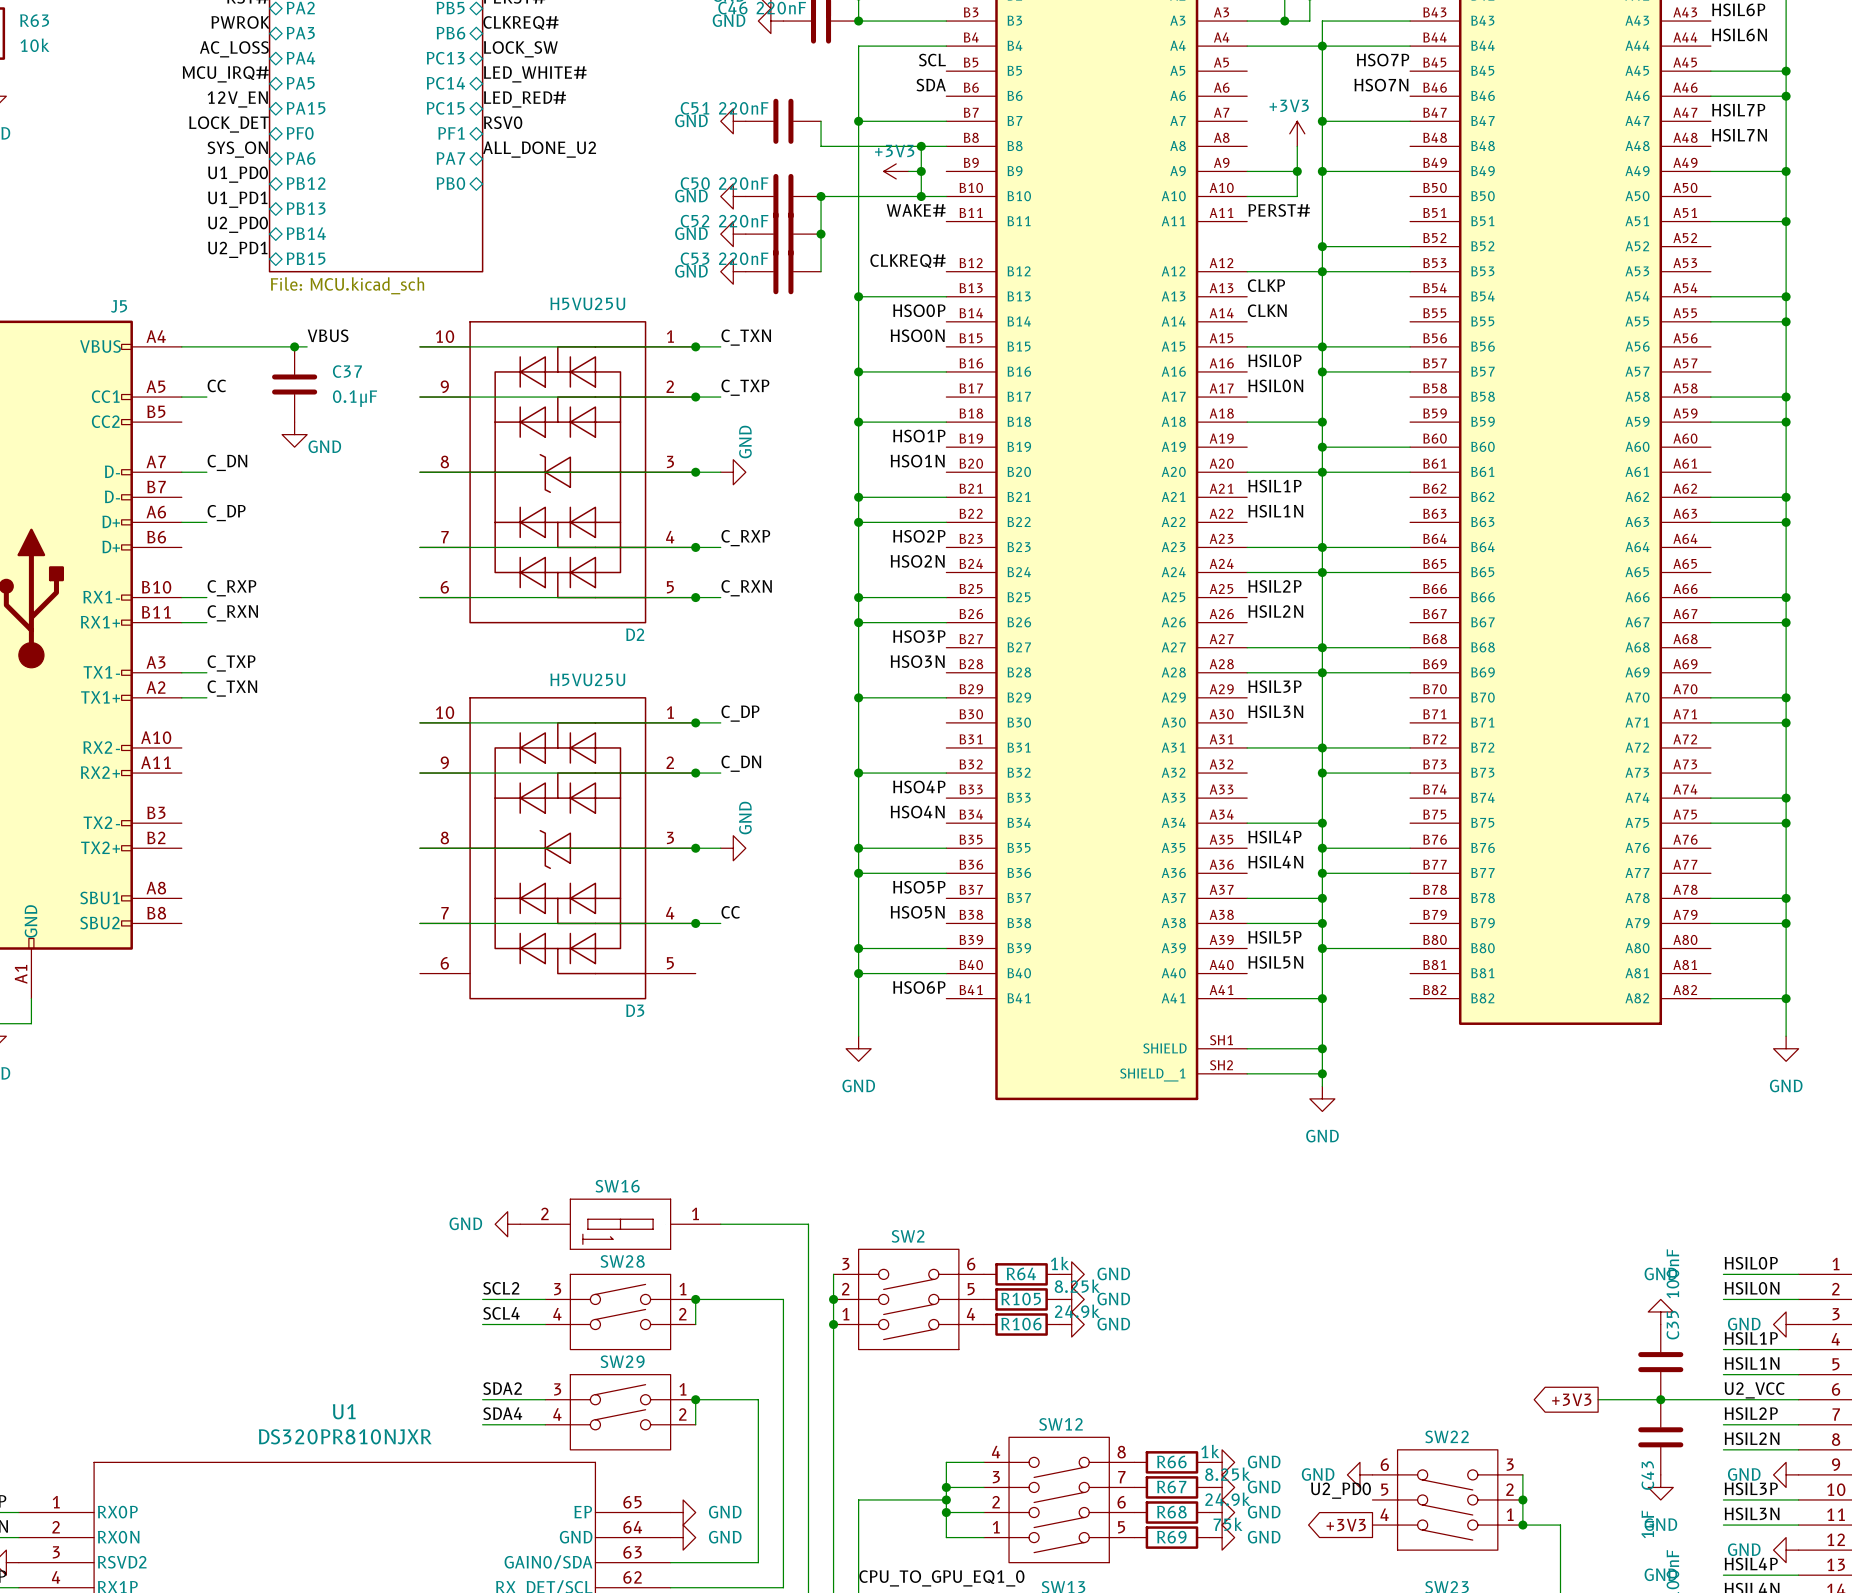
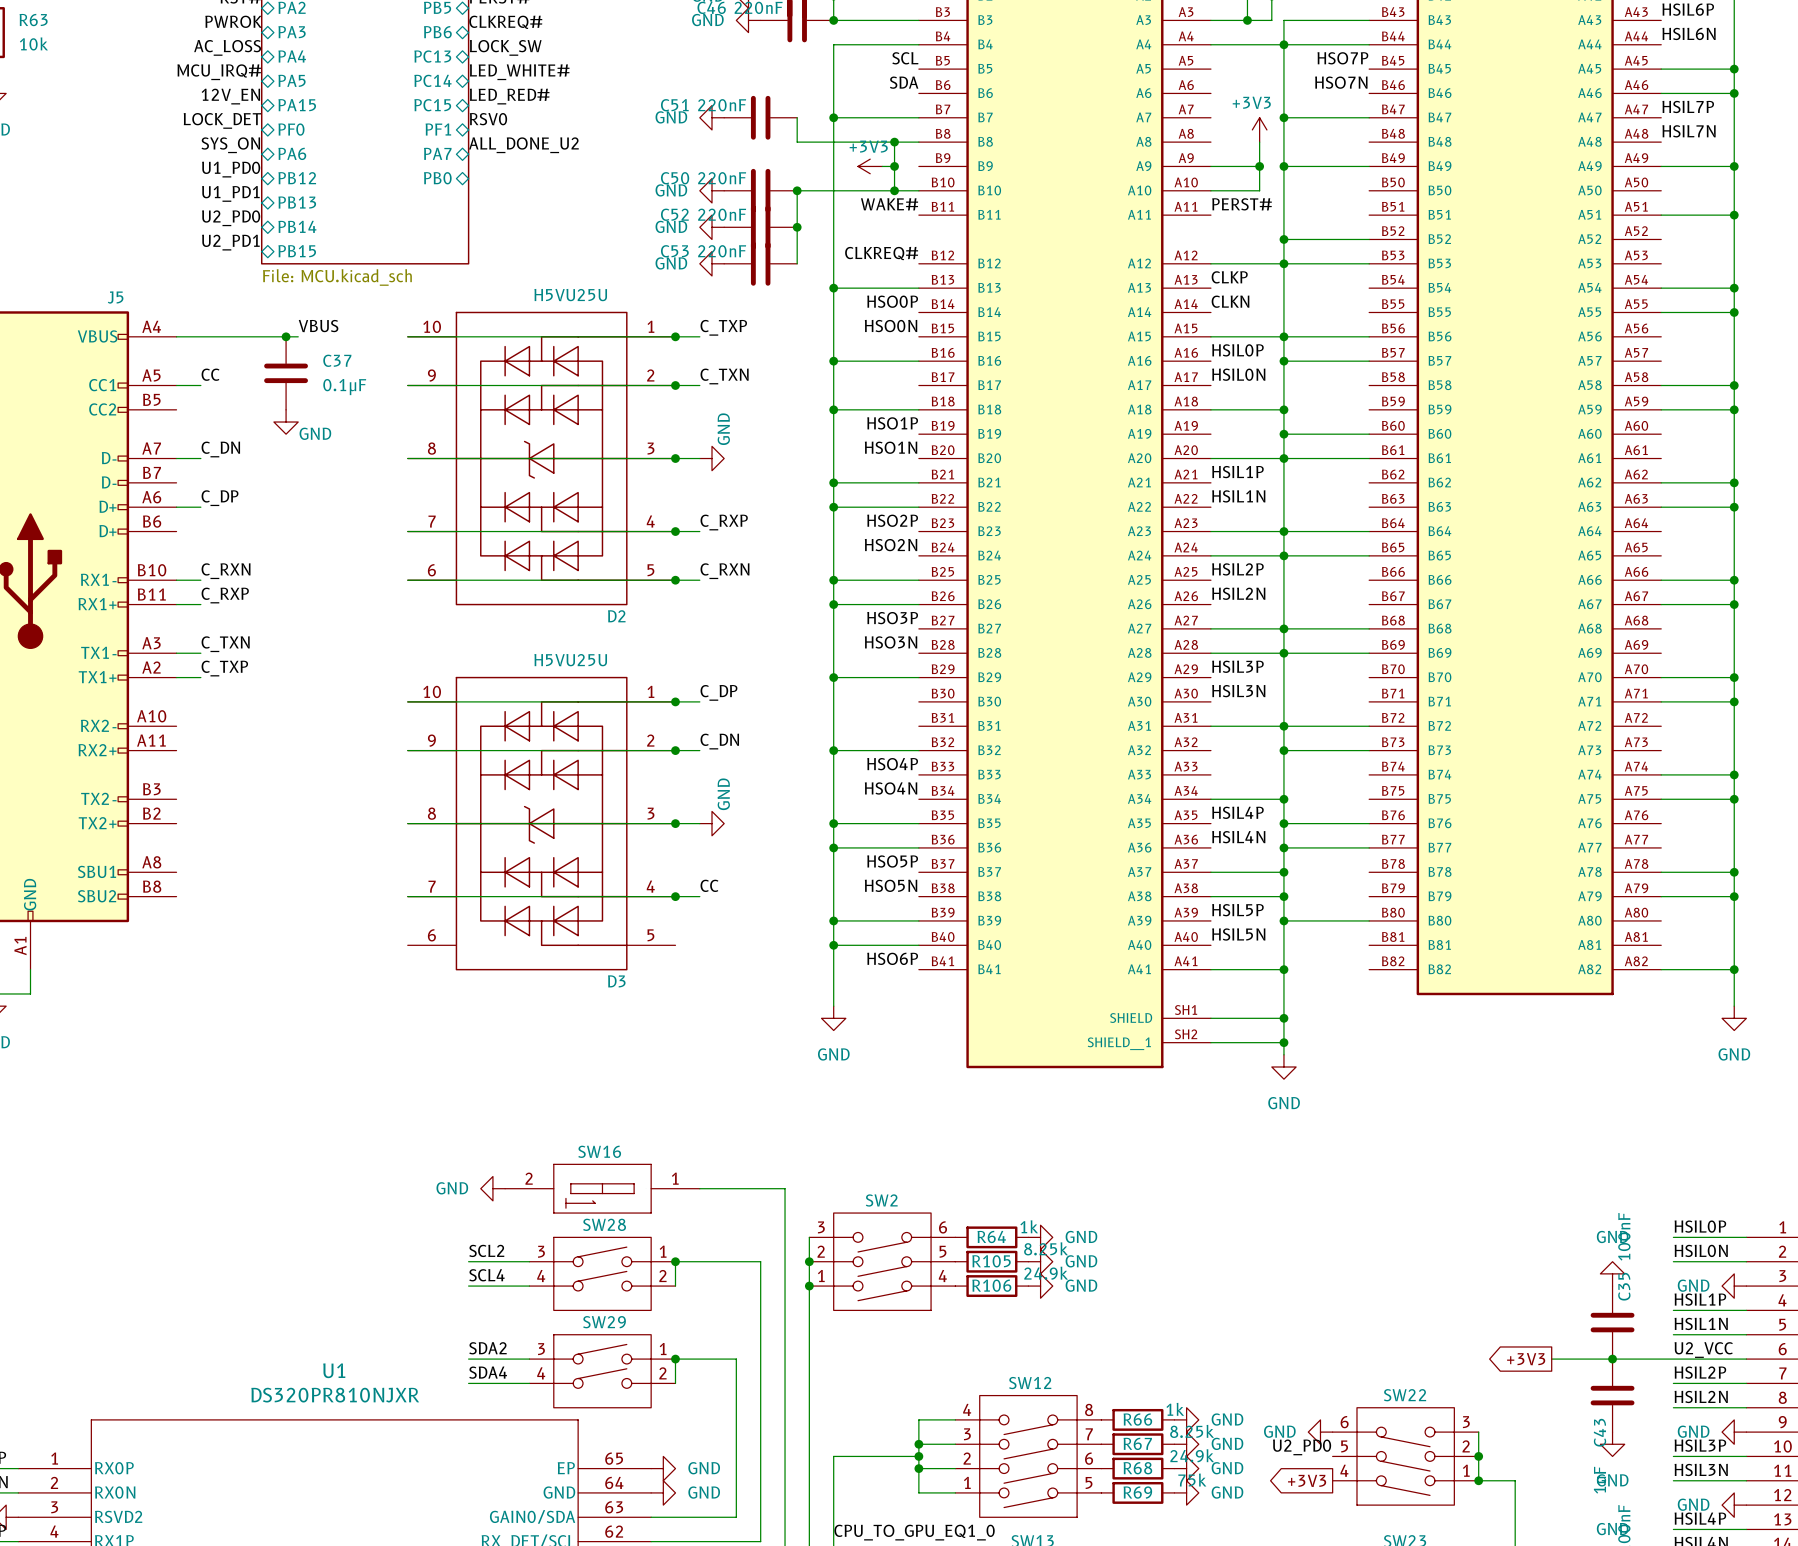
label: C_TXN (746, 337) -> C_TXP (723, 327)
label: C_TXP (745, 387) -> C_TXN (724, 376)
label: C_RXP (231, 588) -> C_RXN (226, 571)
label: C_RXN (232, 613) -> C_RXP (225, 595)
label: C_TXP (231, 663) -> C_TXN (225, 644)
label: C_TXN (232, 688) -> C_TXP (224, 668)

